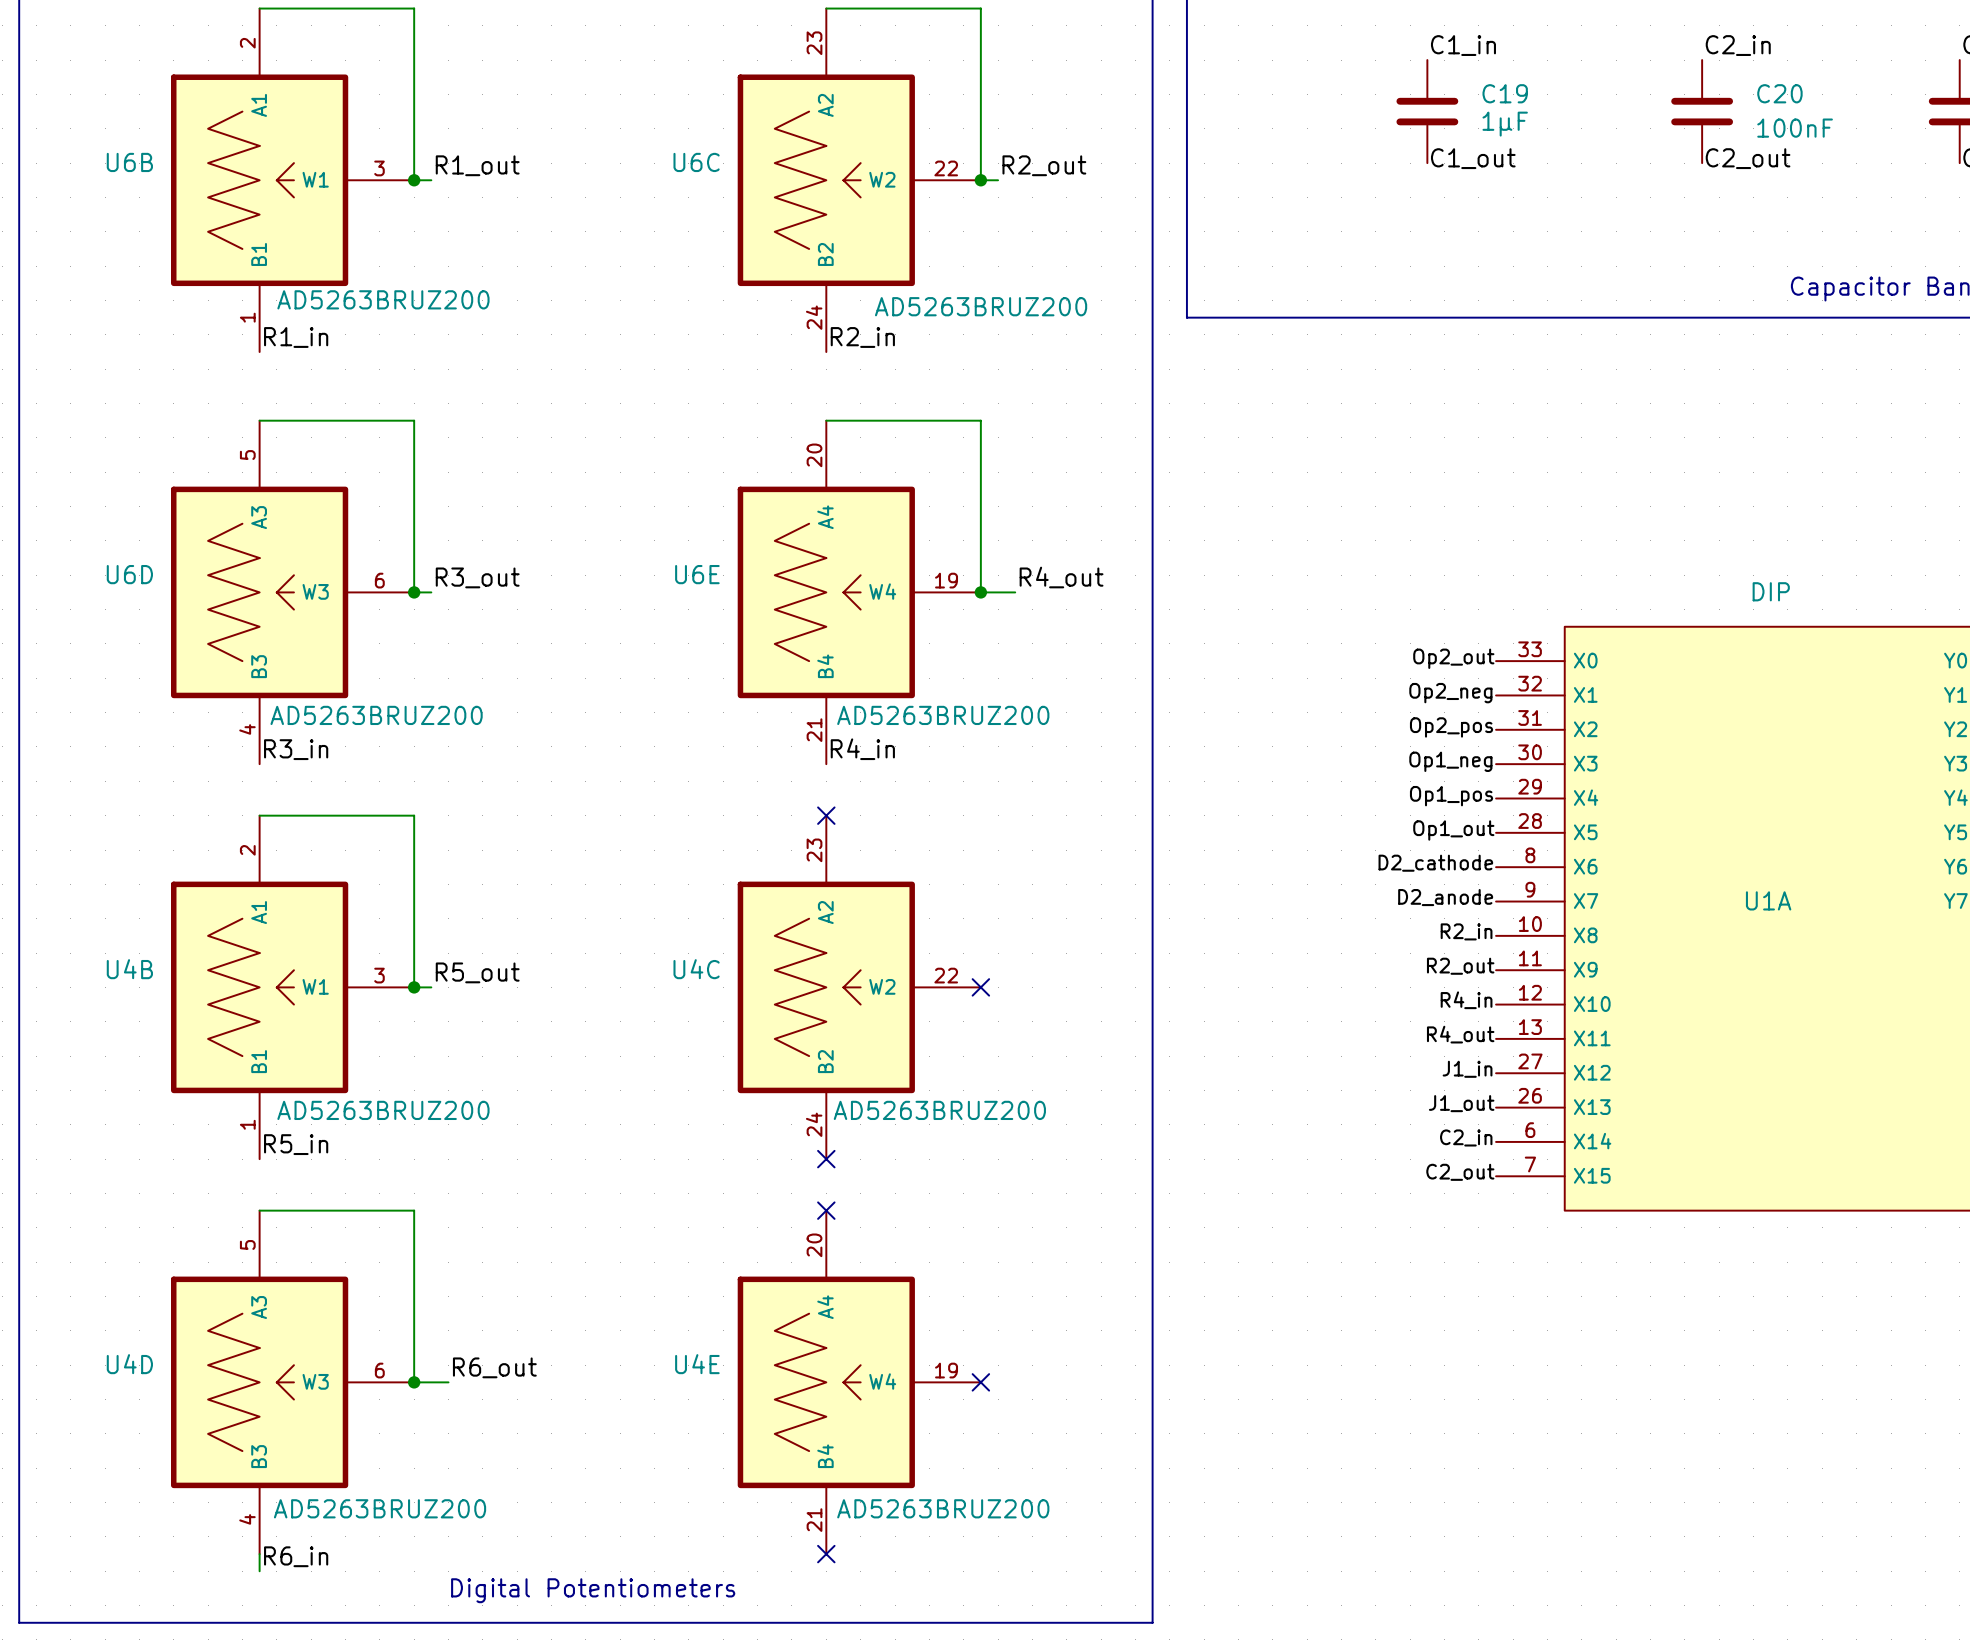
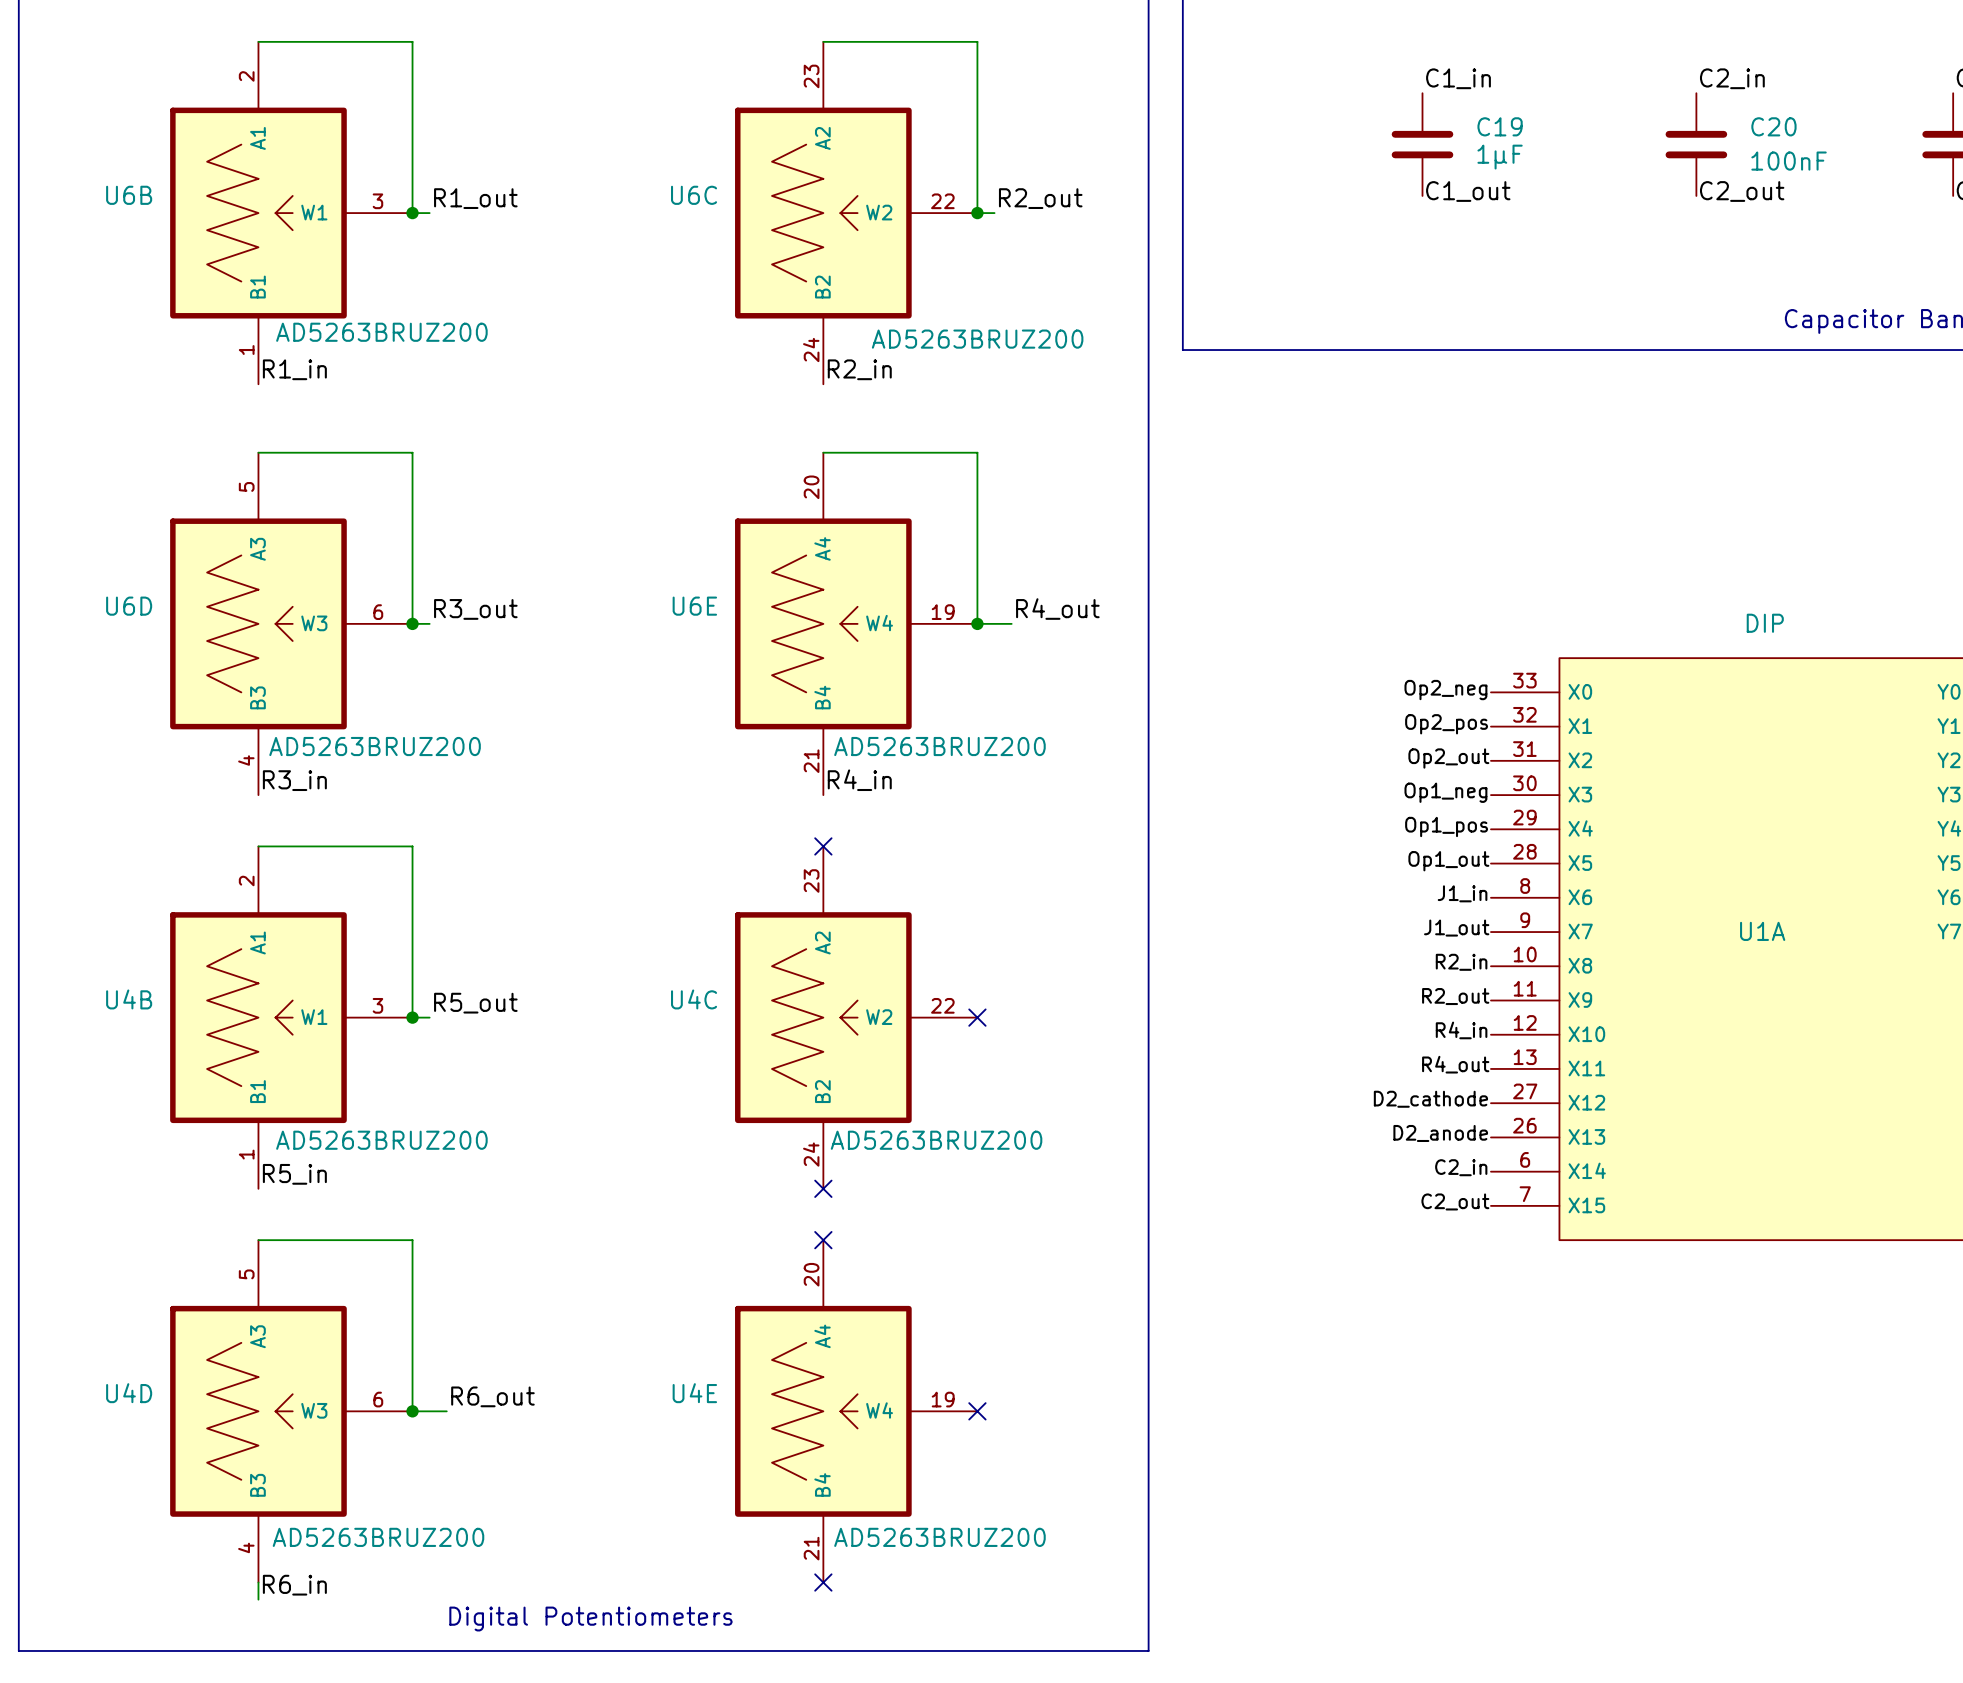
label: Op2_out (1453, 658) -> Op2_neg (1445, 690)
label: Op2_neg (1450, 693) -> Op2_pos (1446, 724)
label: Op2_pos (1451, 727) -> Op2_out (1448, 758)
label: D2_cathode (1435, 863) -> J1_in (1462, 893)
label: D2_anode (1445, 897) -> J1_out (1456, 928)
label: J1_in (1467, 1069) -> D2_cathode (1430, 1099)
label: J1_out (1461, 1103) -> D2_anode (1440, 1133)

